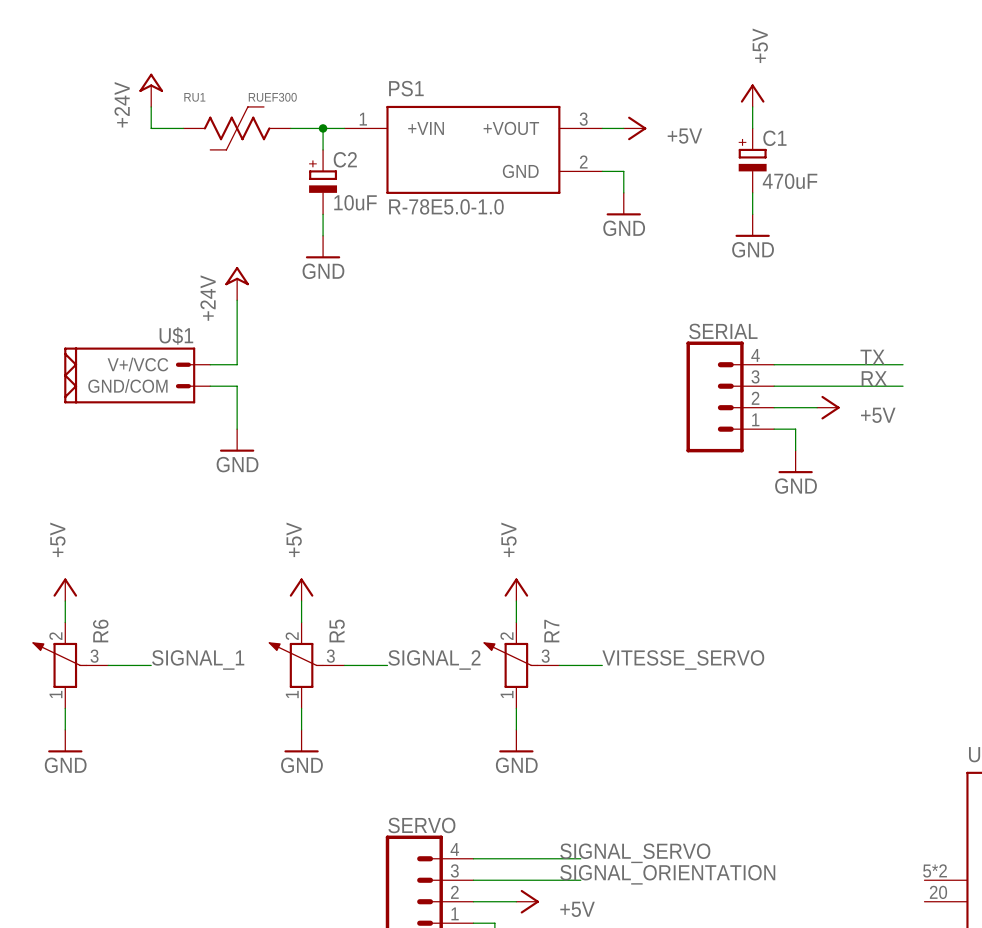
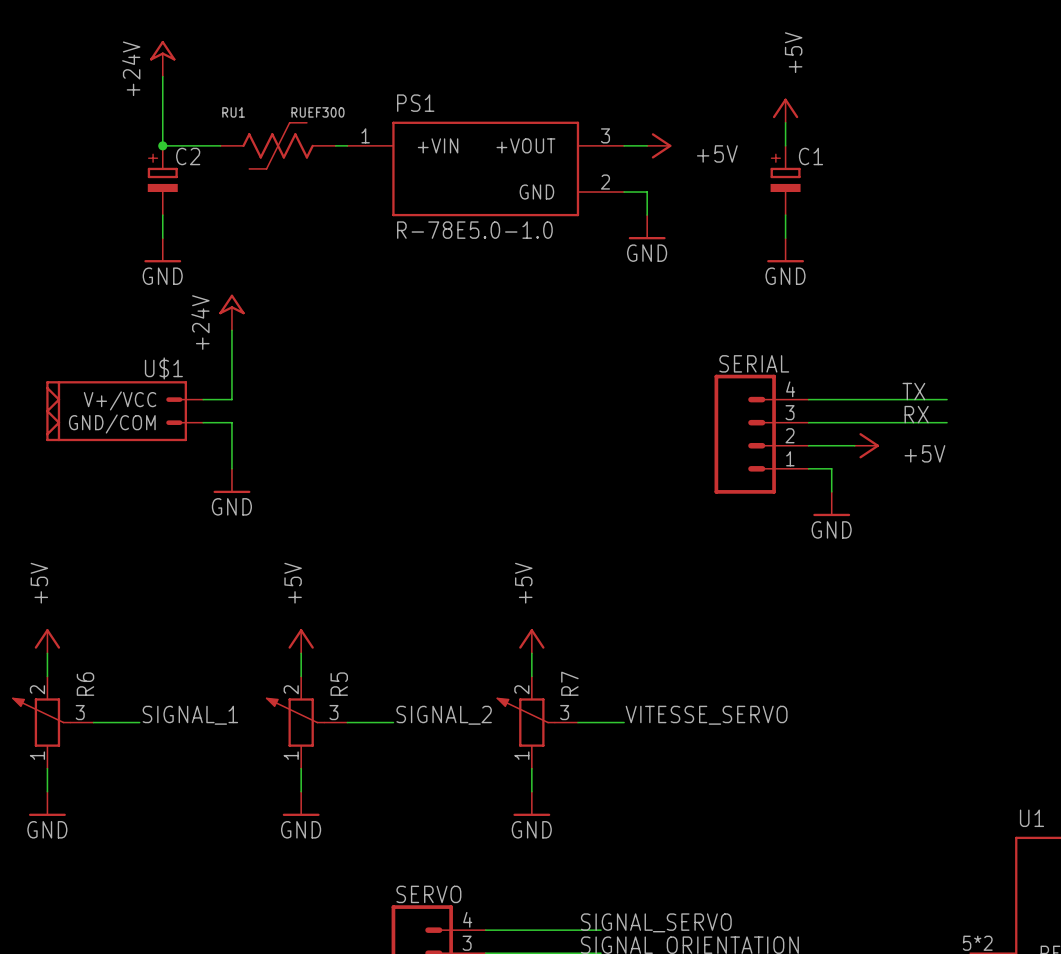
power symbol position: +24V (151, 90) -> +24V (162, 58)
wire: (151, 106) (151, 128) (172, 128) -> (162, 76) (162, 145)
junction: none -> (162, 145)
RU1 position: (237, 128) -> (278, 145)
wire: (323, 128) (323, 149) -> none
junction: (323, 128) -> none
C1 value: 470uF (790, 181) -> none
C2 position: (323, 182) -> (162, 180)
C2 value: 10uF (355, 202) -> none
wire: (323, 214) (323, 235) -> (162, 215) (162, 238)
power symbol position: GND (323, 247) -> GND (162, 250)

